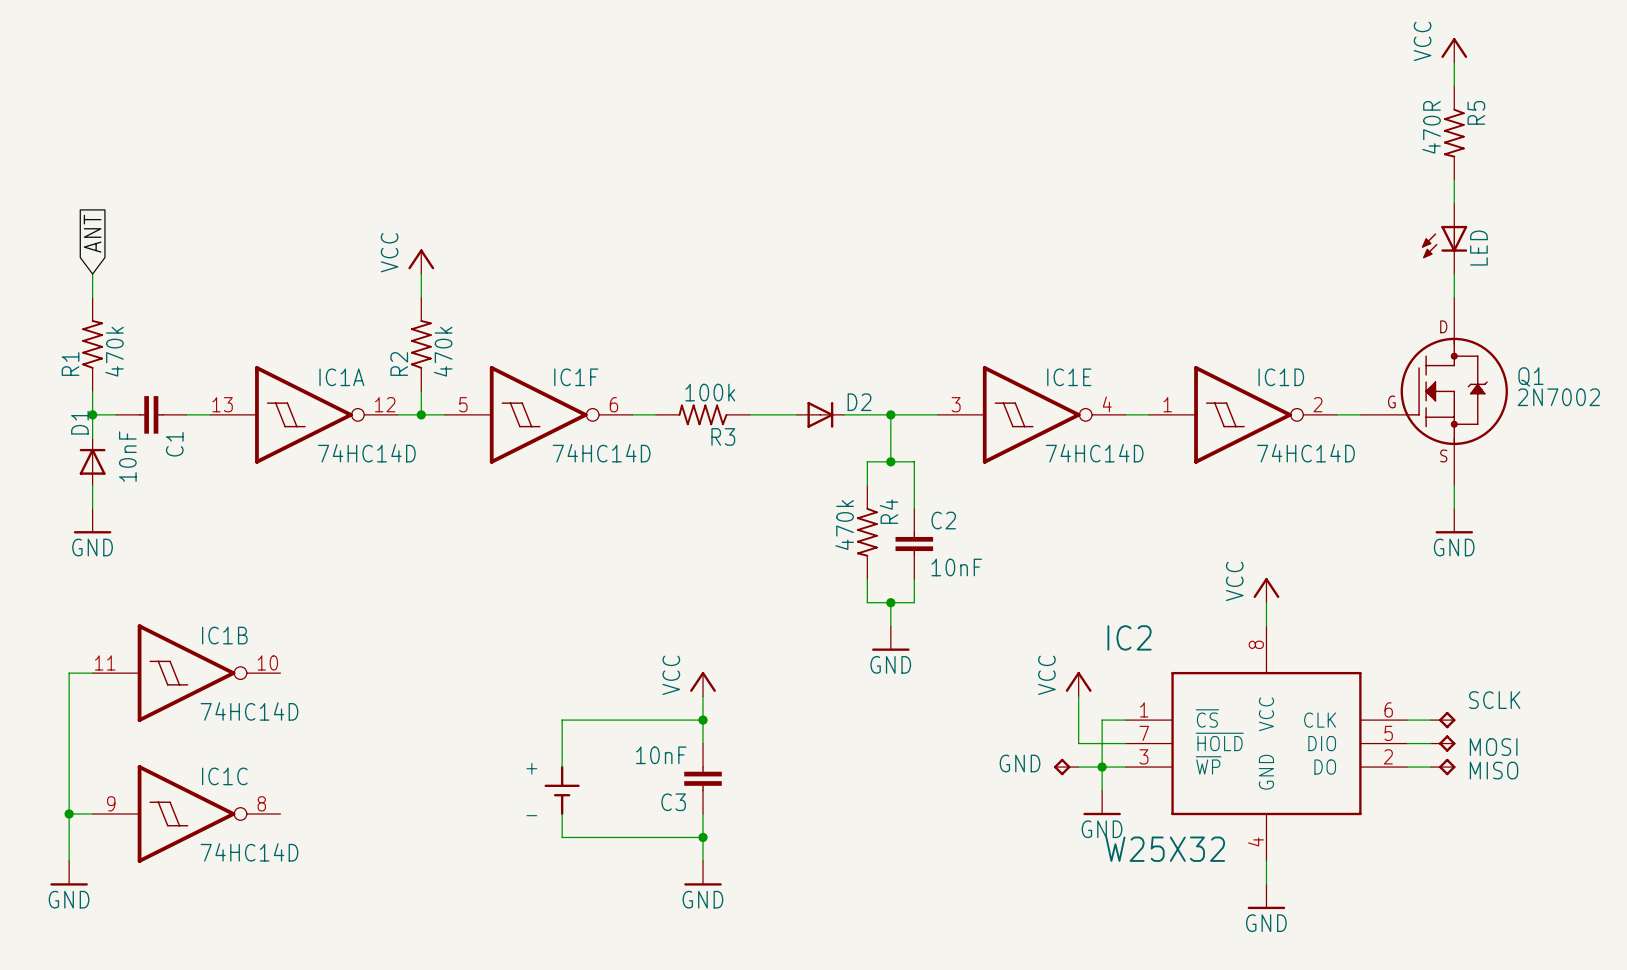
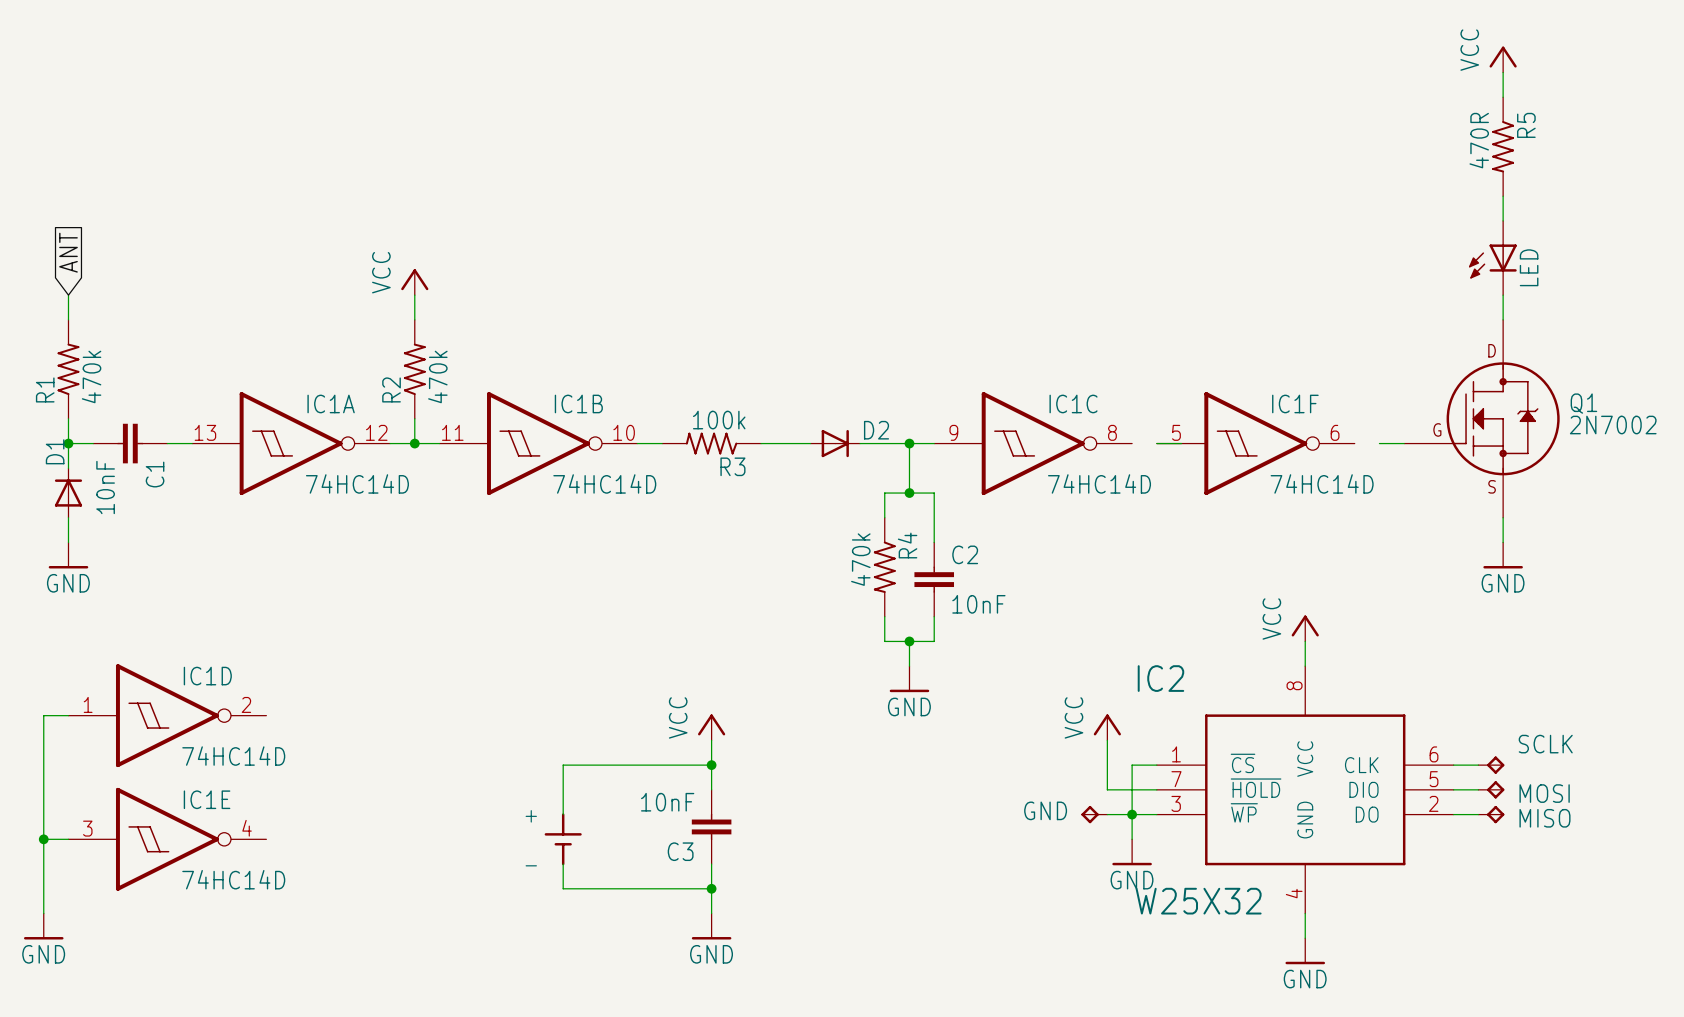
IC1F position: (538, 414) -> (1255, 443)
IC1E position: (1031, 414) -> (167, 839)
IC1D position: (1242, 414) -> (167, 715)
IC1B position: (186, 673) -> (538, 443)
wire: (69, 813) (92, 813) -> (43, 839) (68, 839)
junction position: (69, 813) -> (43, 839)
IC1C position: (186, 813) -> (1033, 443)

